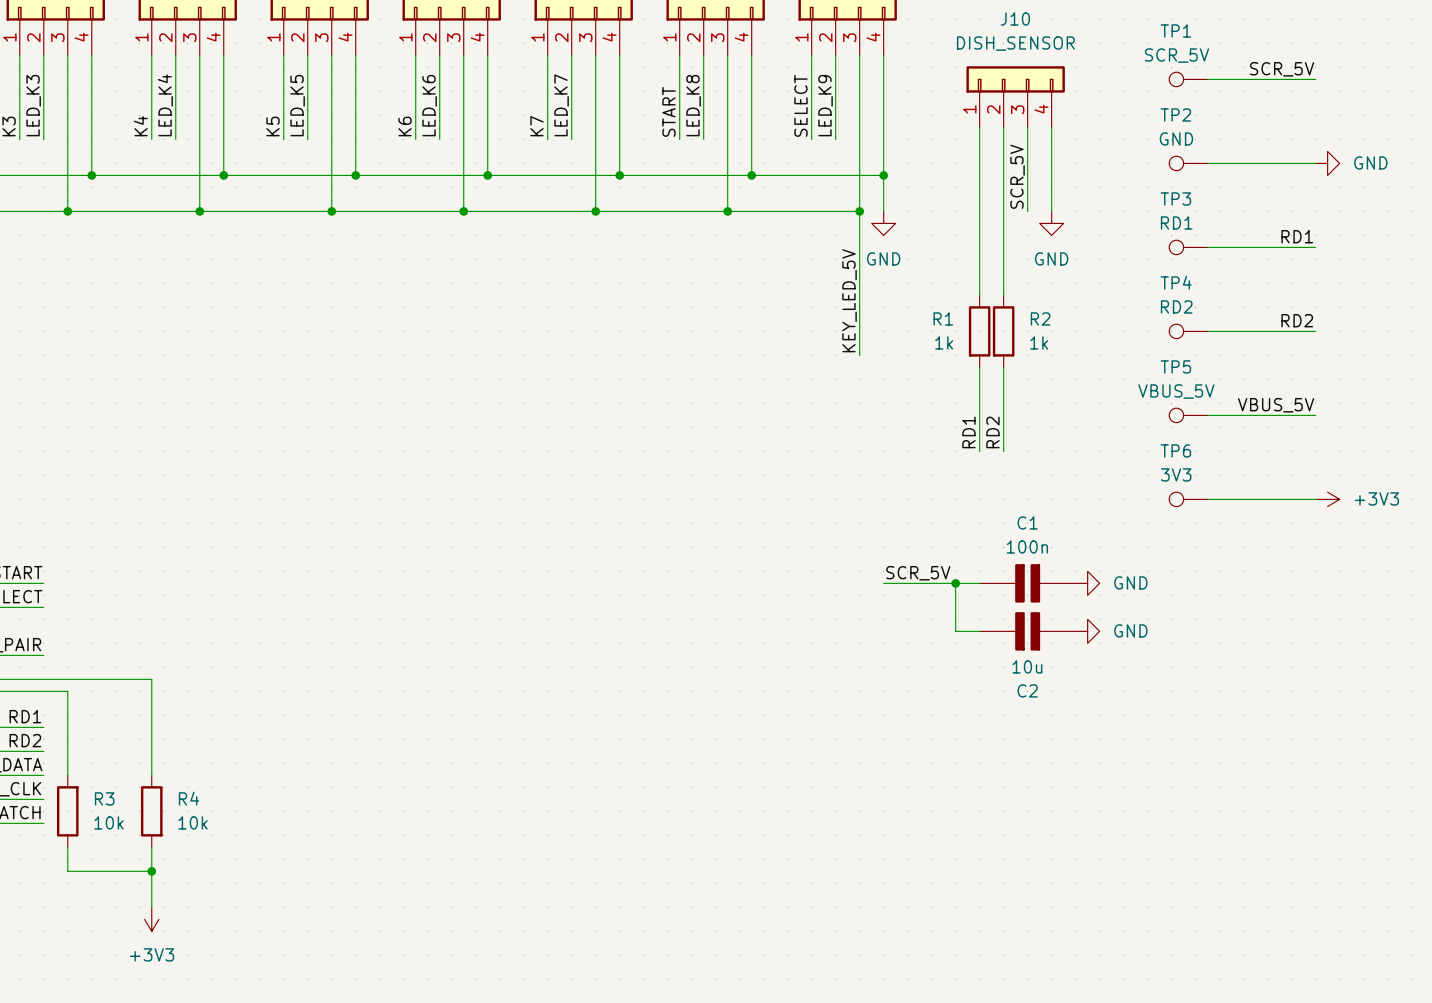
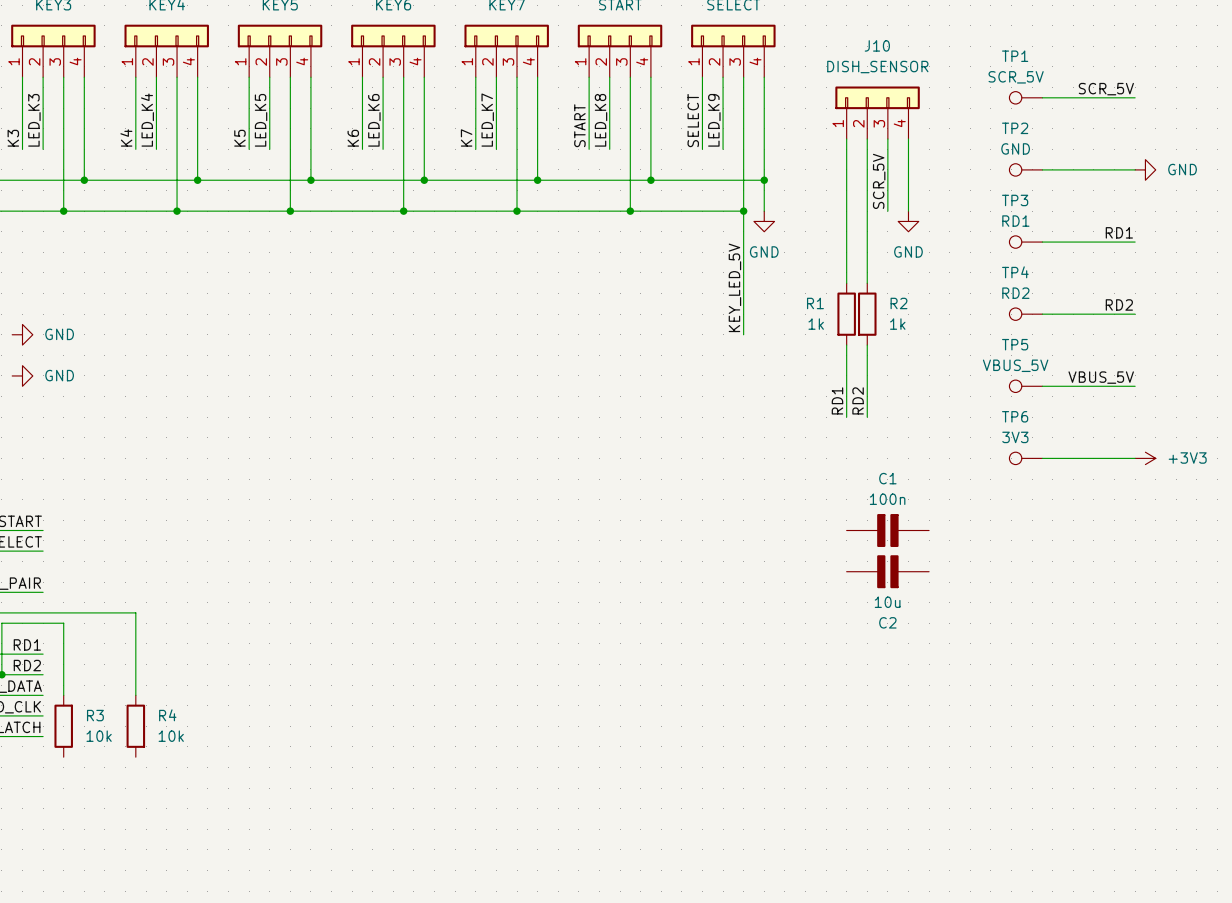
power symbol: none -> GND (22, 334)
power symbol: none -> GND (22, 375)
label: SCR_5V (918, 573) -> none
wire: (883, 583) (979, 583) -> none
wire: (955, 583) (955, 631) (979, 631) -> none
junction: (955, 583) -> none
power symbol: GND (1087, 583) -> none
power symbol: GND (1087, 631) -> none
wire: (67, 847) (67, 871) (151, 871) -> none
wire: (151, 847) (151, 907) -> none
junction: (151, 871) -> none
power symbol: +3V3 (151, 919) -> none

